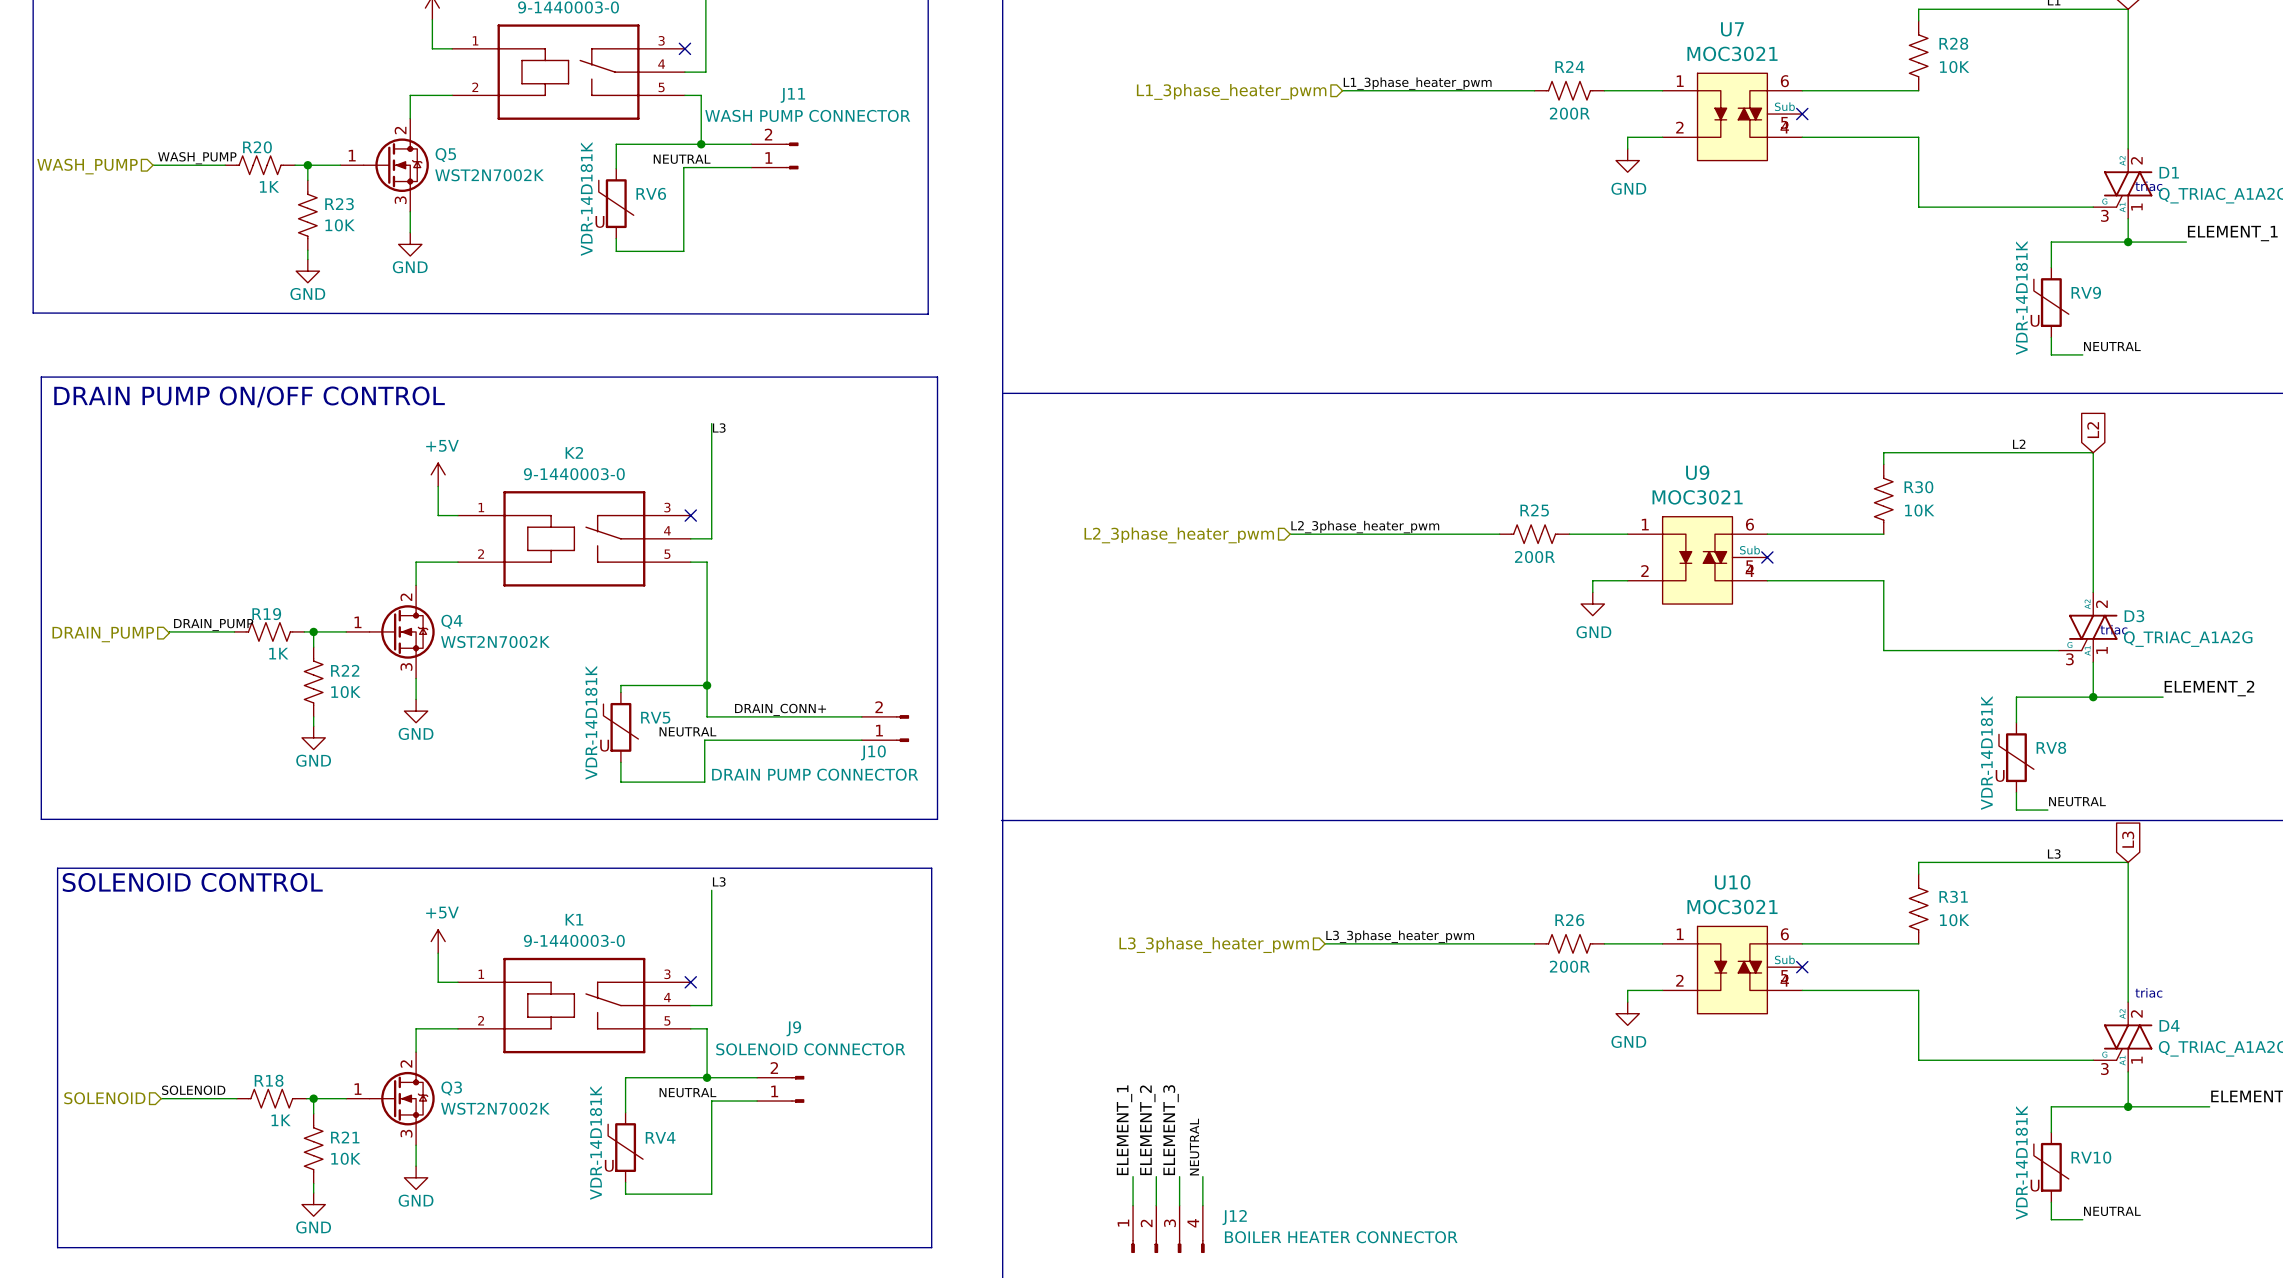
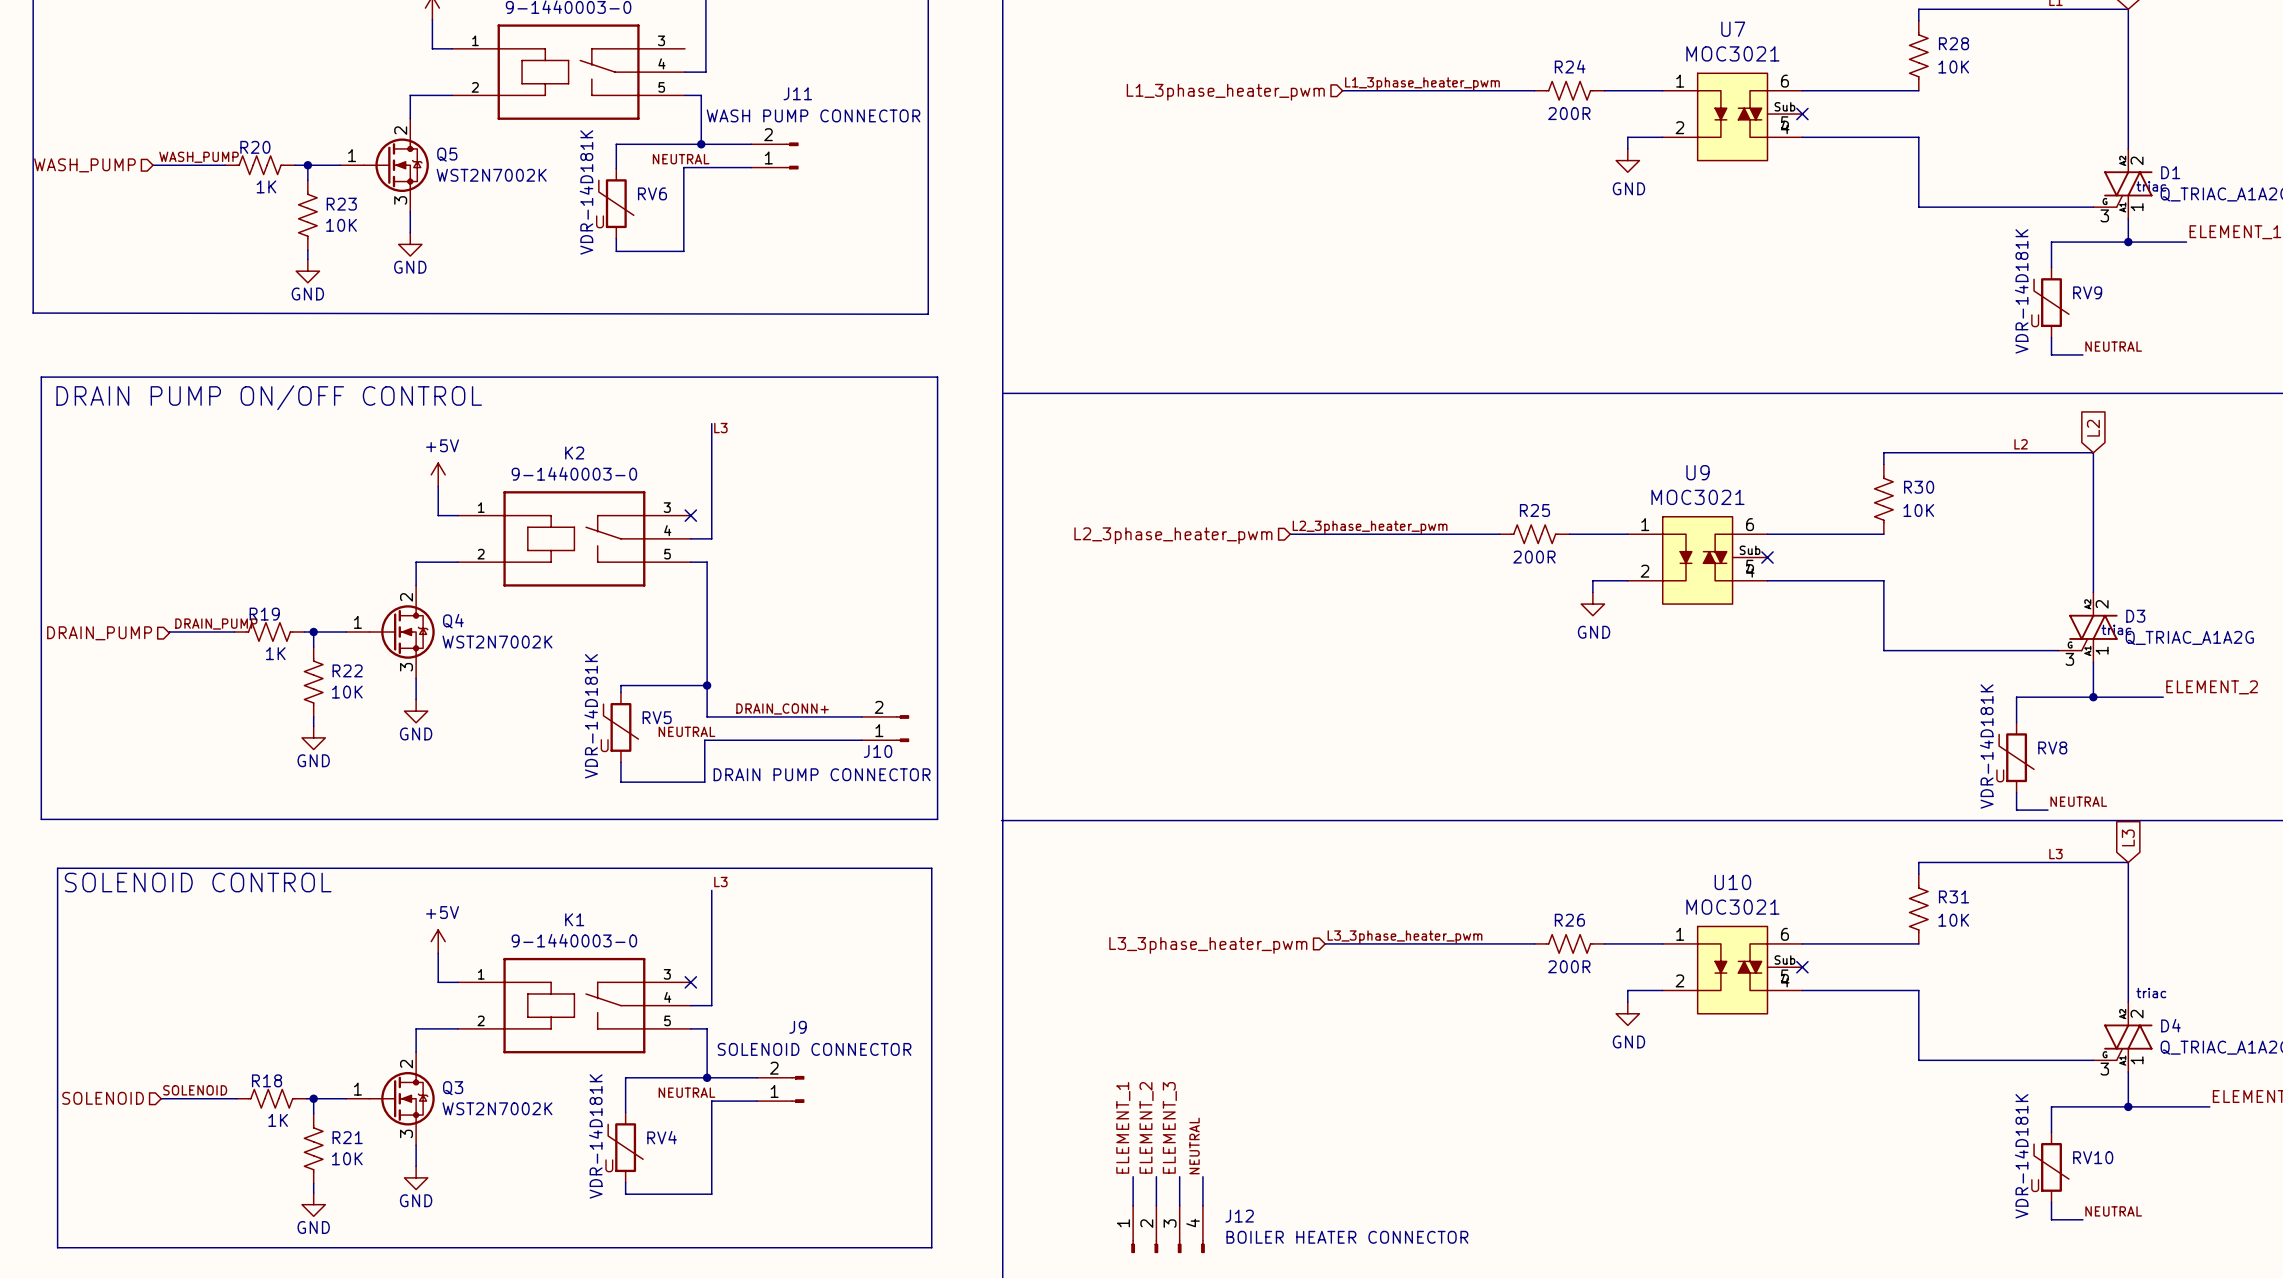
no-connect mark: (684, 48) -> none

